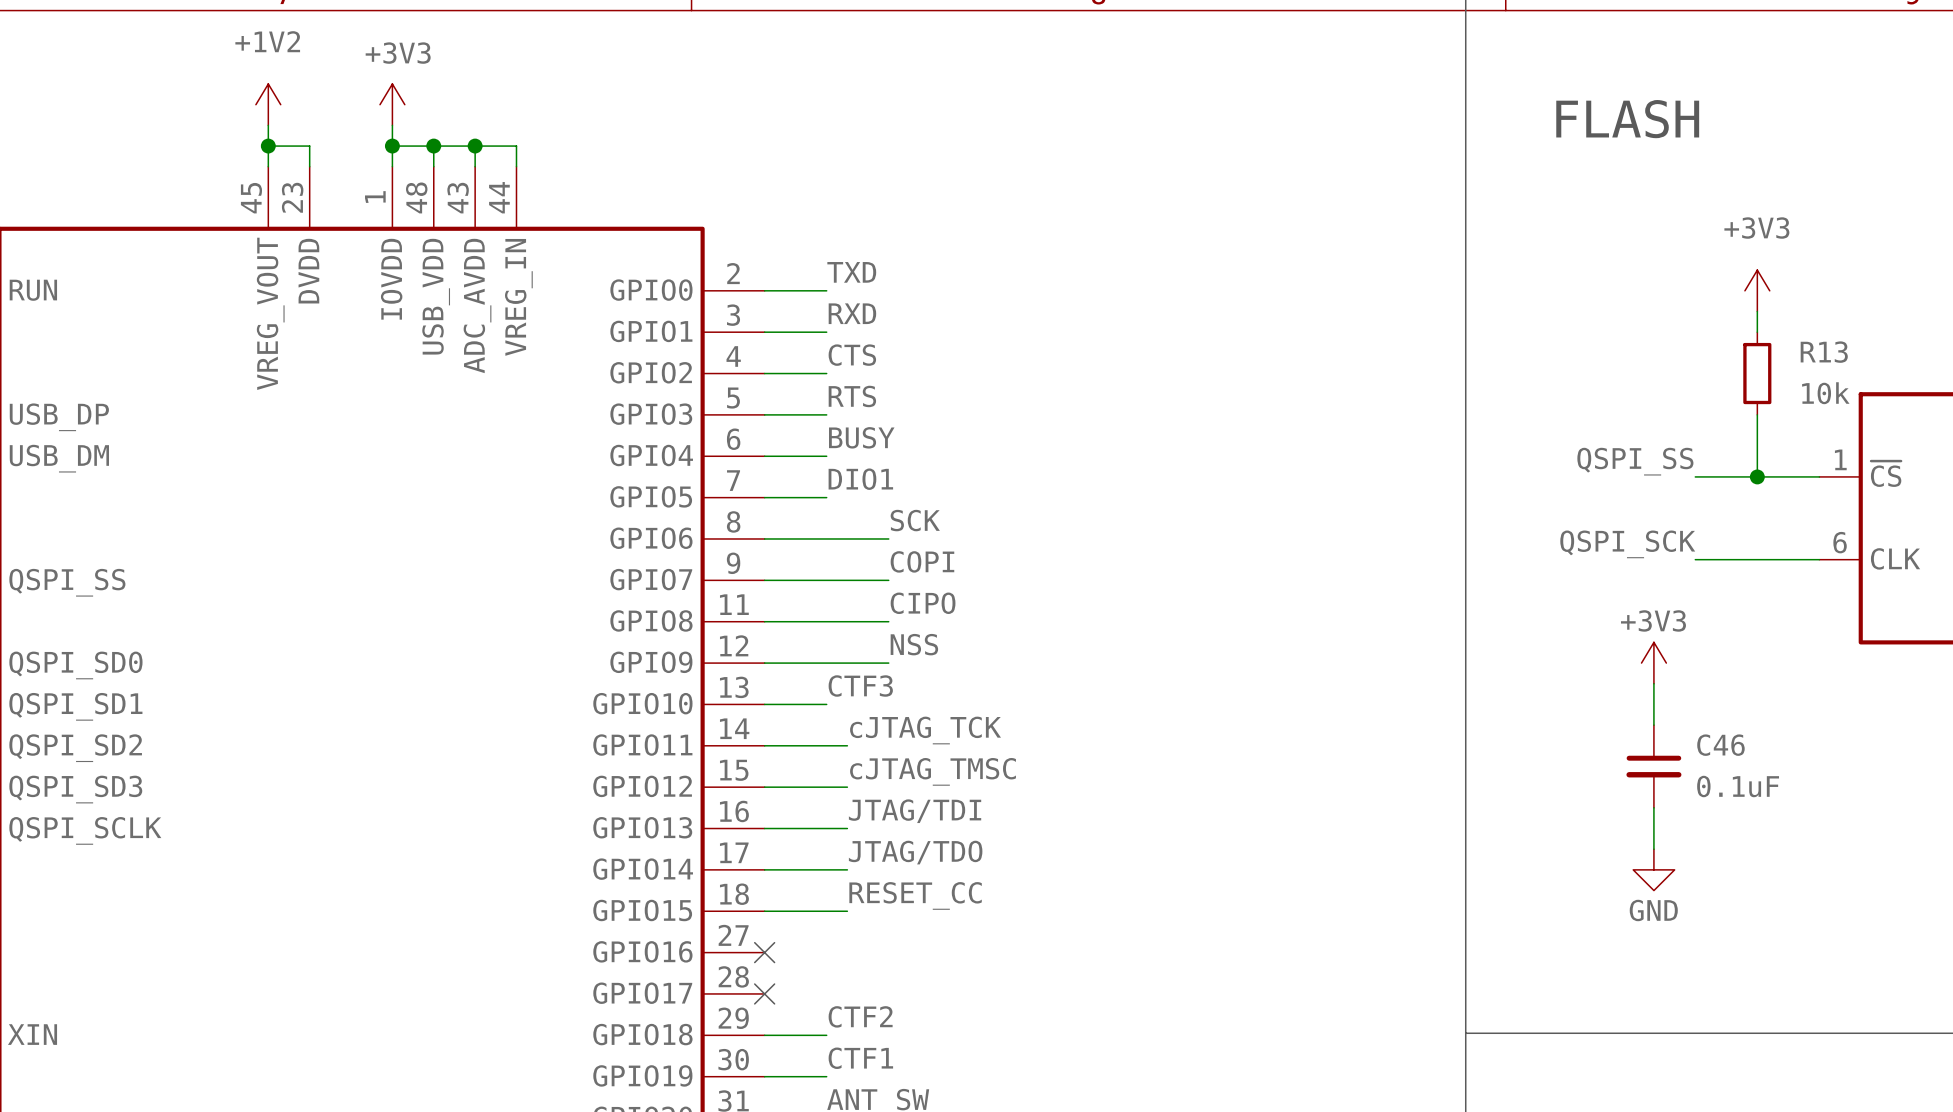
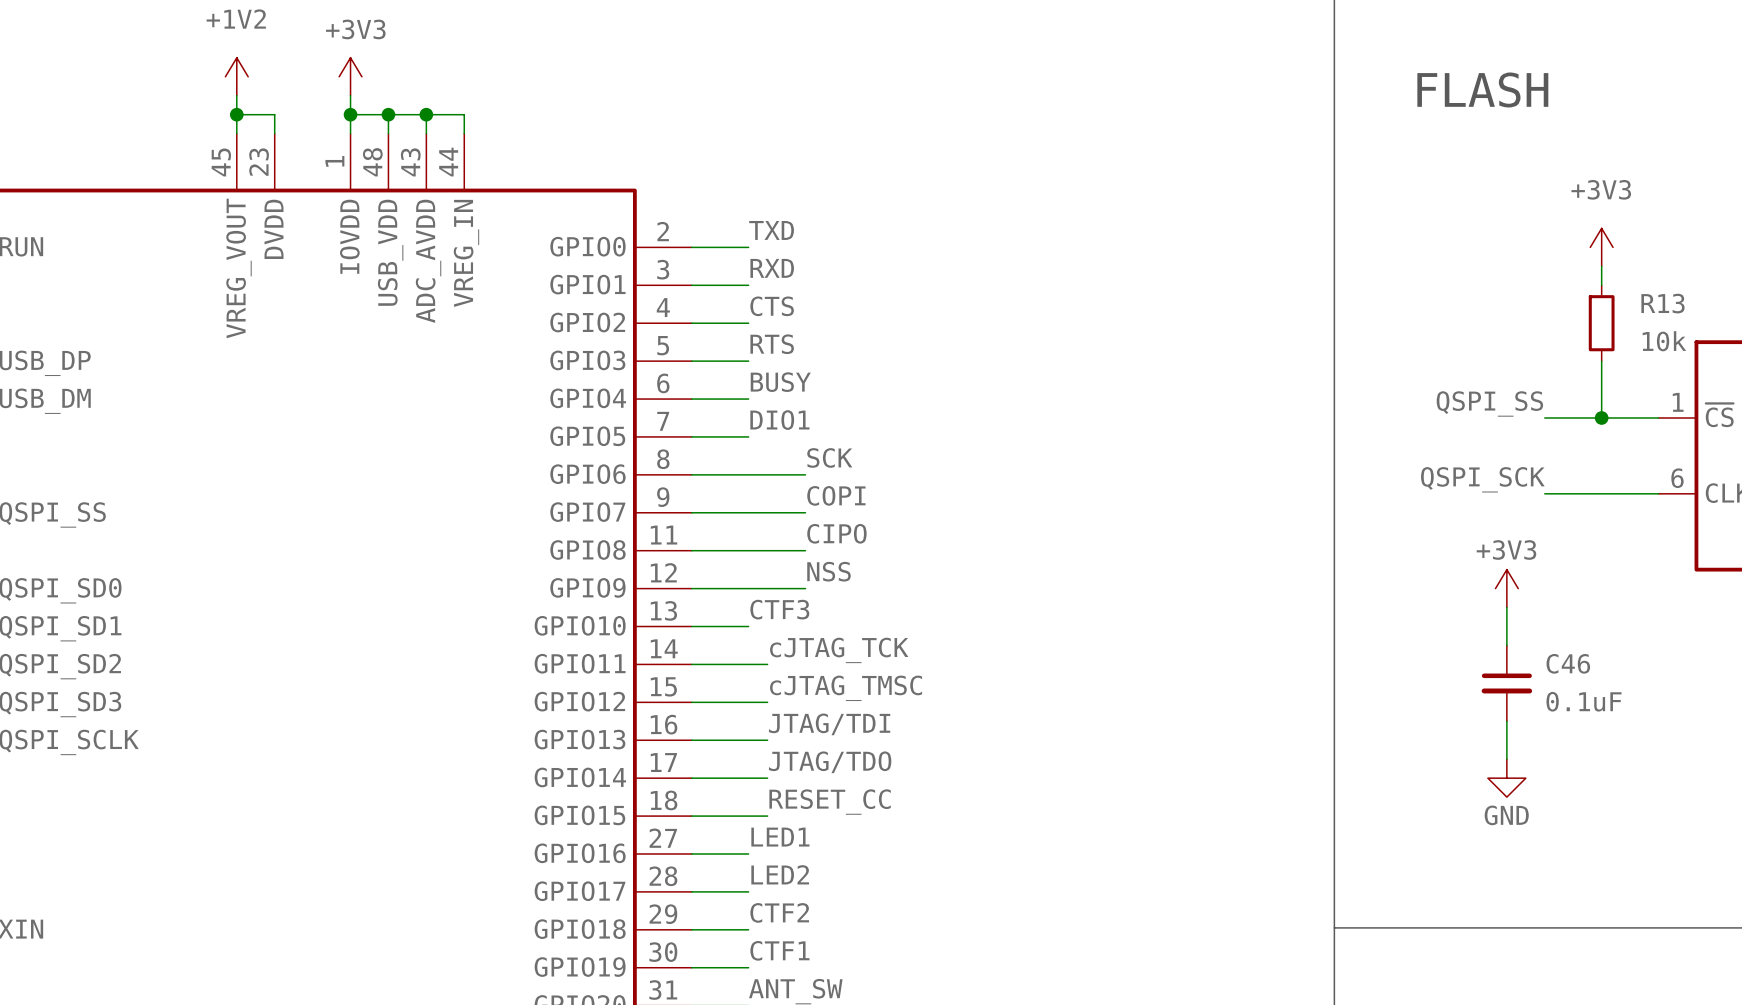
label: none -> LED1 (780, 837)
wire: none -> (691, 853) (748, 853)
no-connect mark: (764, 952) -> none
label: none -> LED2 (780, 874)
wire: none -> (691, 891) (748, 891)
no-connect mark: (764, 993) -> none

